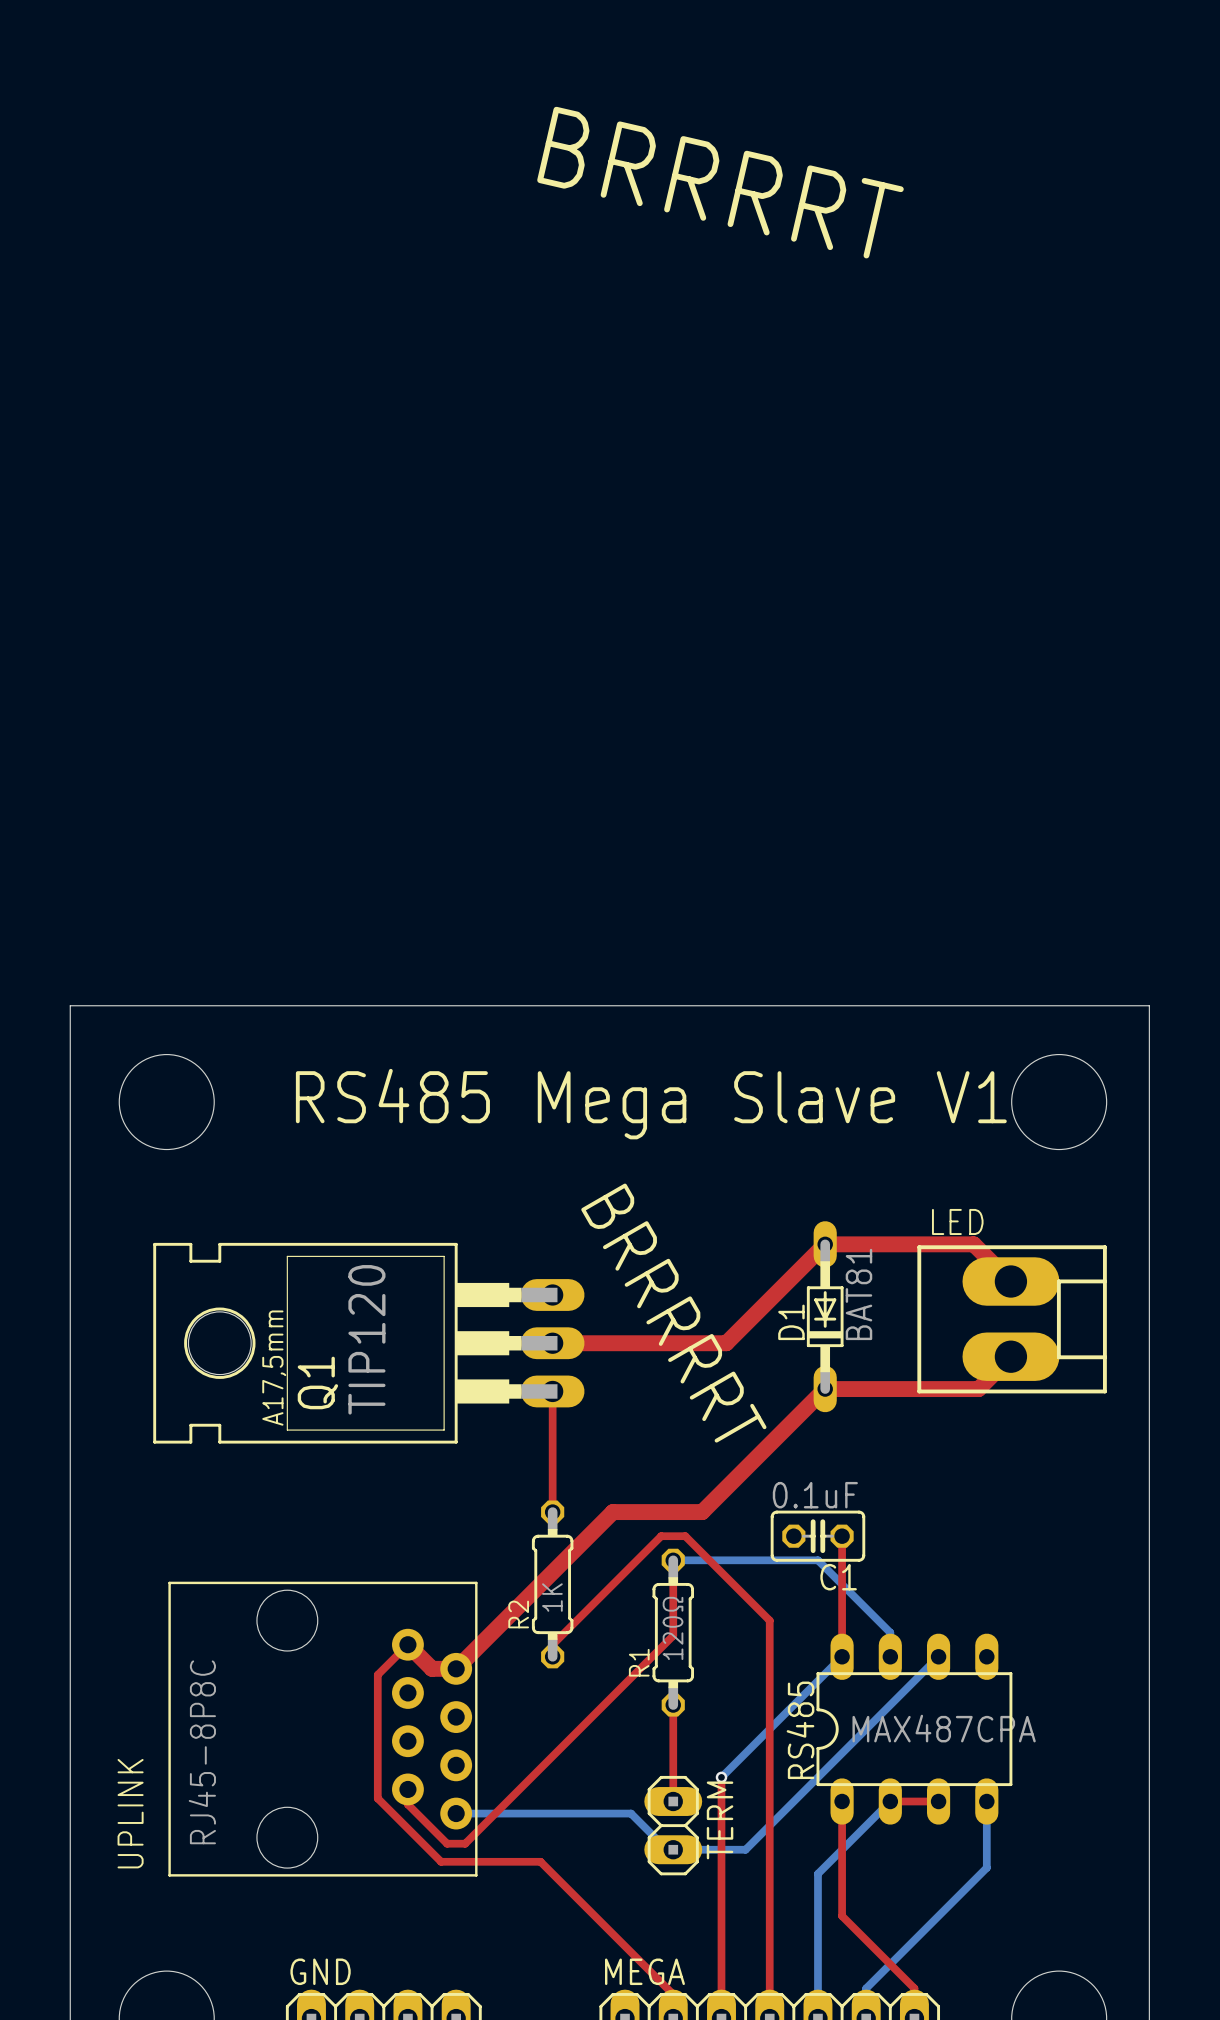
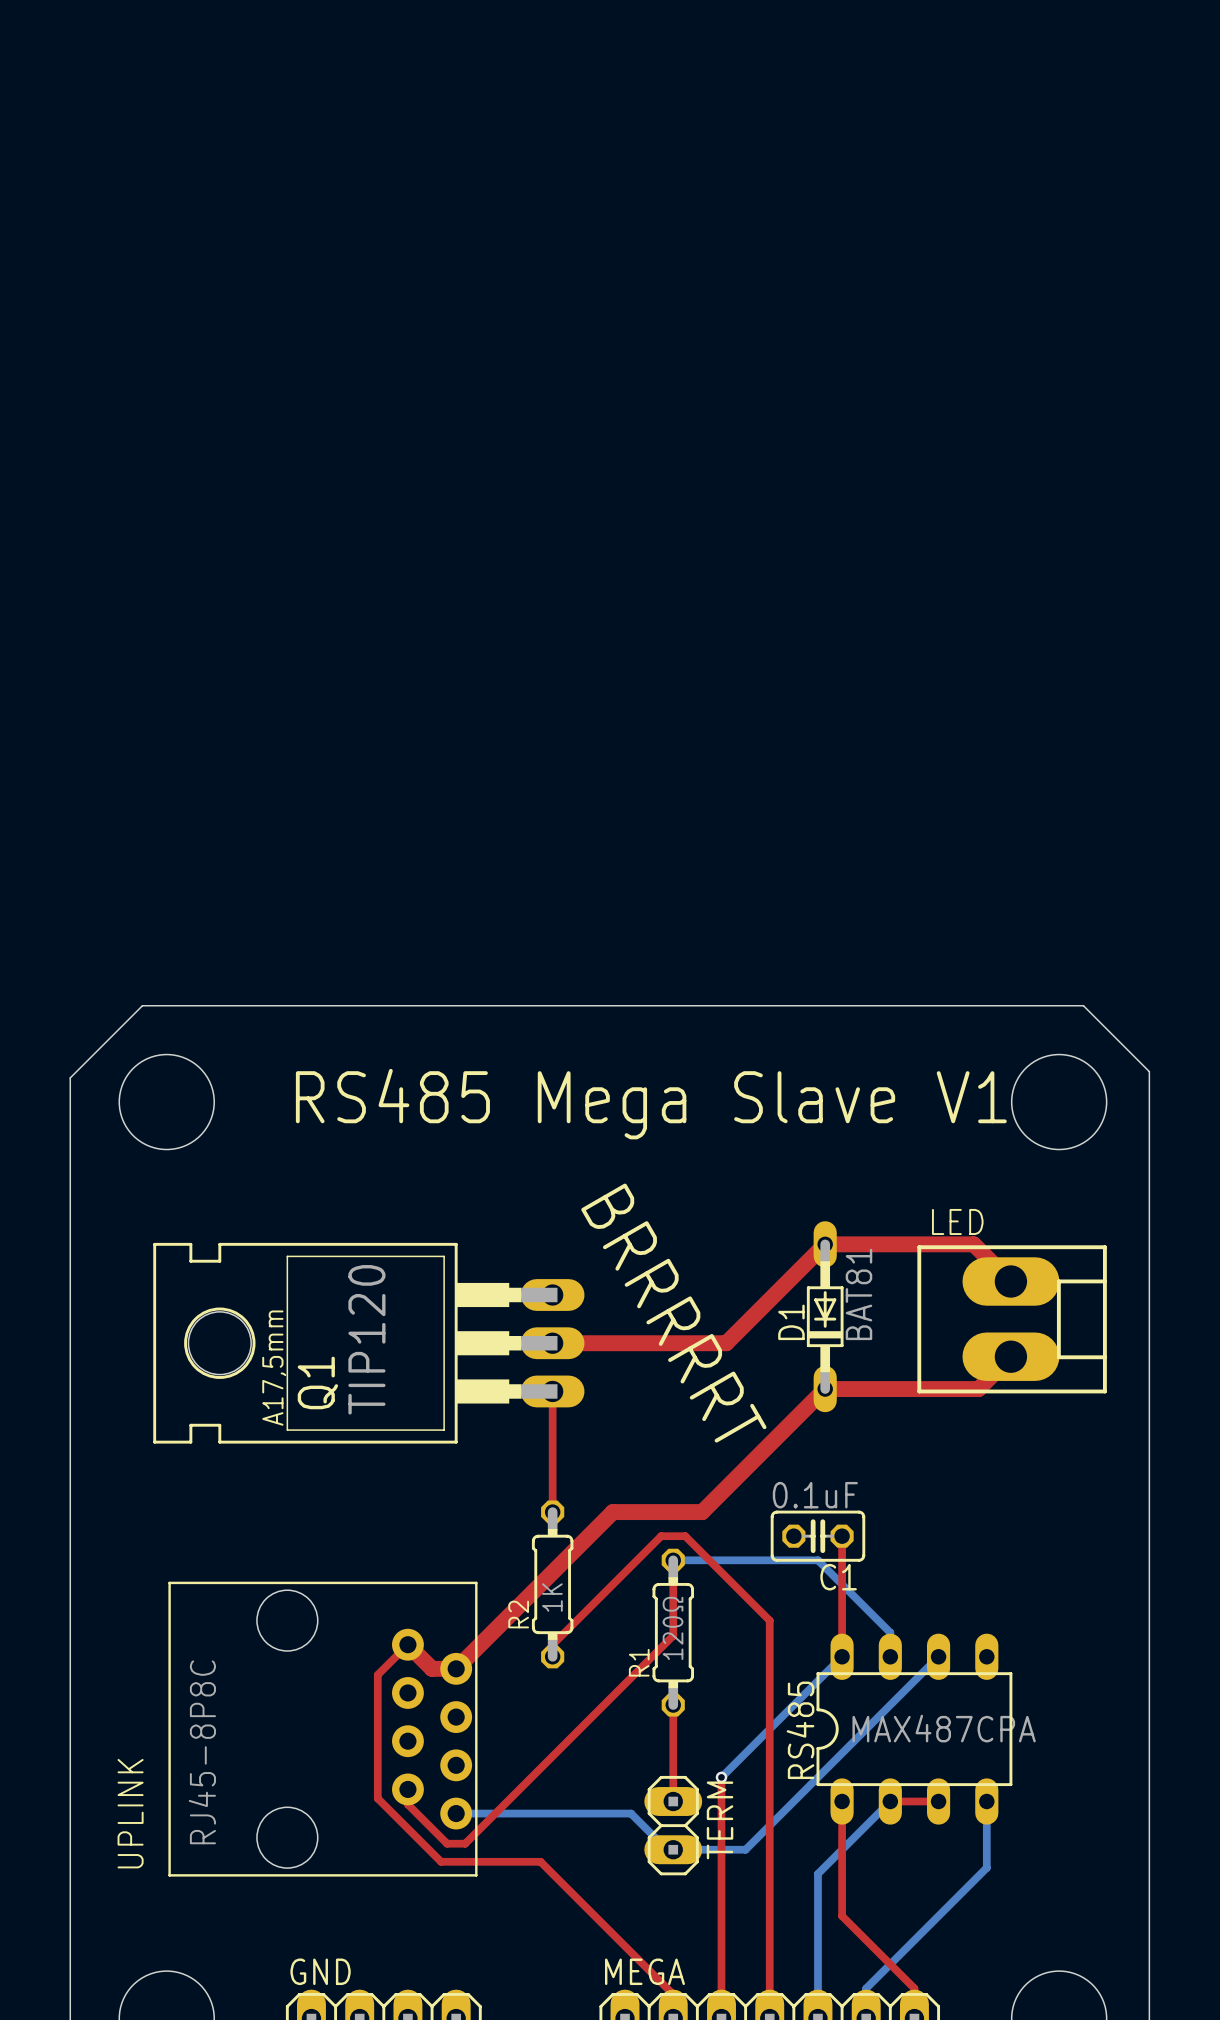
text: BRRRRT (720, 182) -> none
board edge: (142, 1005) (70, 1005) (70, 1077) -> (142, 1005) (70, 1077)
board edge: (1083, 1005) (1149, 1005) (1149, 1071) -> (1083, 1005) (1149, 1071)

